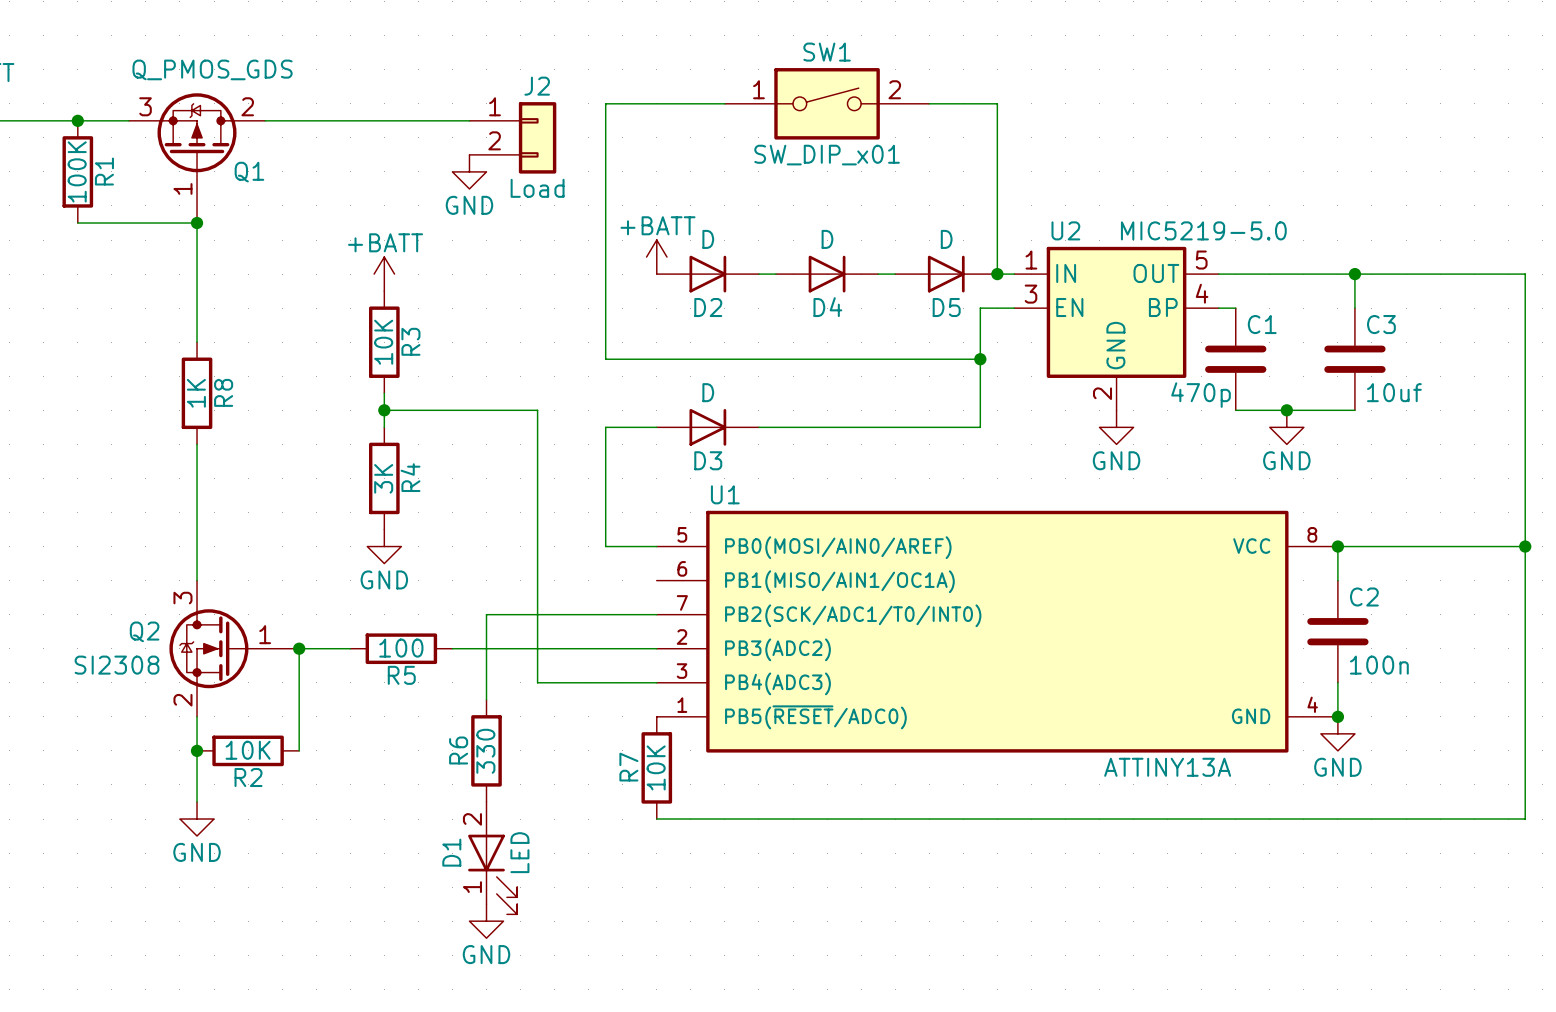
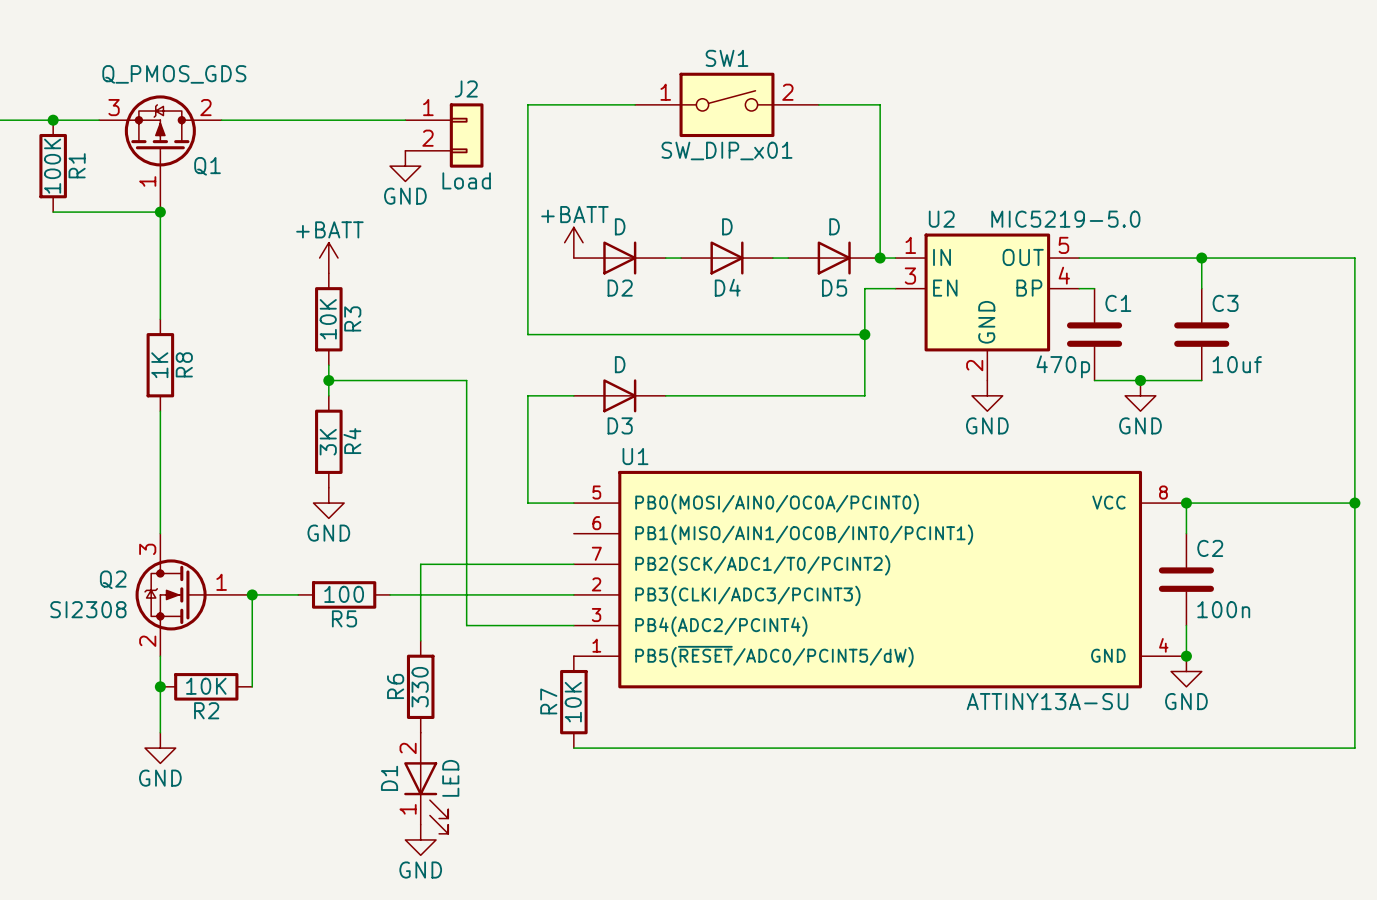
U1 pin name: PB0(MOSI/AIN0/AREF) (838, 547) -> PB0(MOSI/AIN0/OC0A/PCINT0) (777, 504)
U1 pin name: PB1(MISO/AIN1/OC1A) (839, 581) -> PB1(MISO/AIN1/OC0B/INT0/PCINT1) (804, 534)
U1 pin name: PB2(SCK/ADC1/T0/INT0) (853, 615) -> PB2(SCK/ADC1/T0/PCINT2) (762, 565)
U1 pin name: PB3(ADC2) (777, 649) -> PB3(CLKI/ADC3/PCINT3) (747, 595)
U1 pin name: PB4(ADC3) (777, 683) -> PB4(ADC2/PCINT4) (721, 626)
U1 pin name: PB5(~{RESET}/ADC0) (815, 717) -> PB5(~{RESET}/ADC0/PCINT5/dW) (774, 656)
U1 value: ATTINY13A (1167, 767) -> ATTINY13A-SU (1047, 701)

